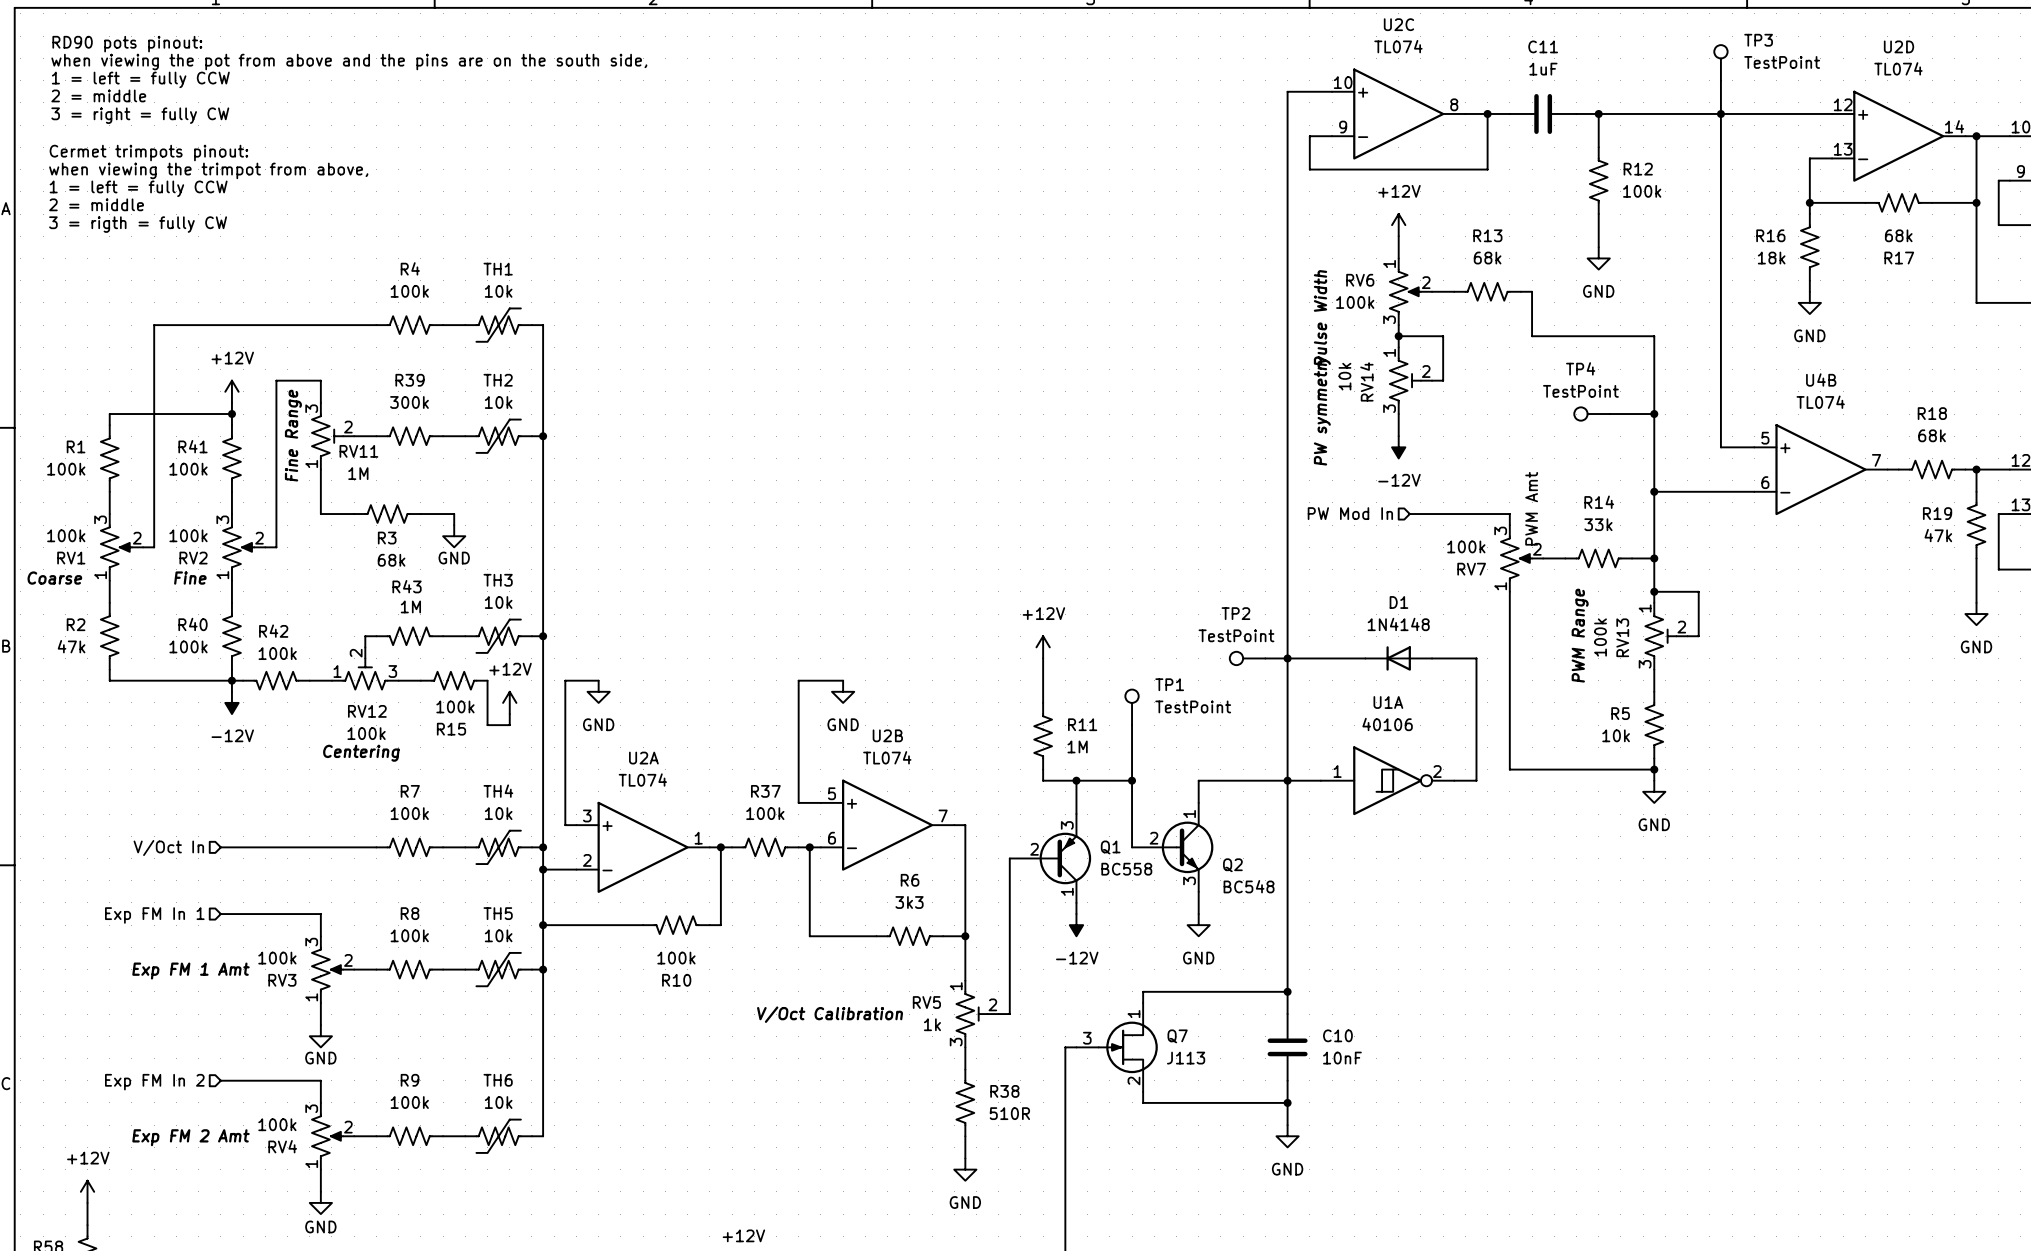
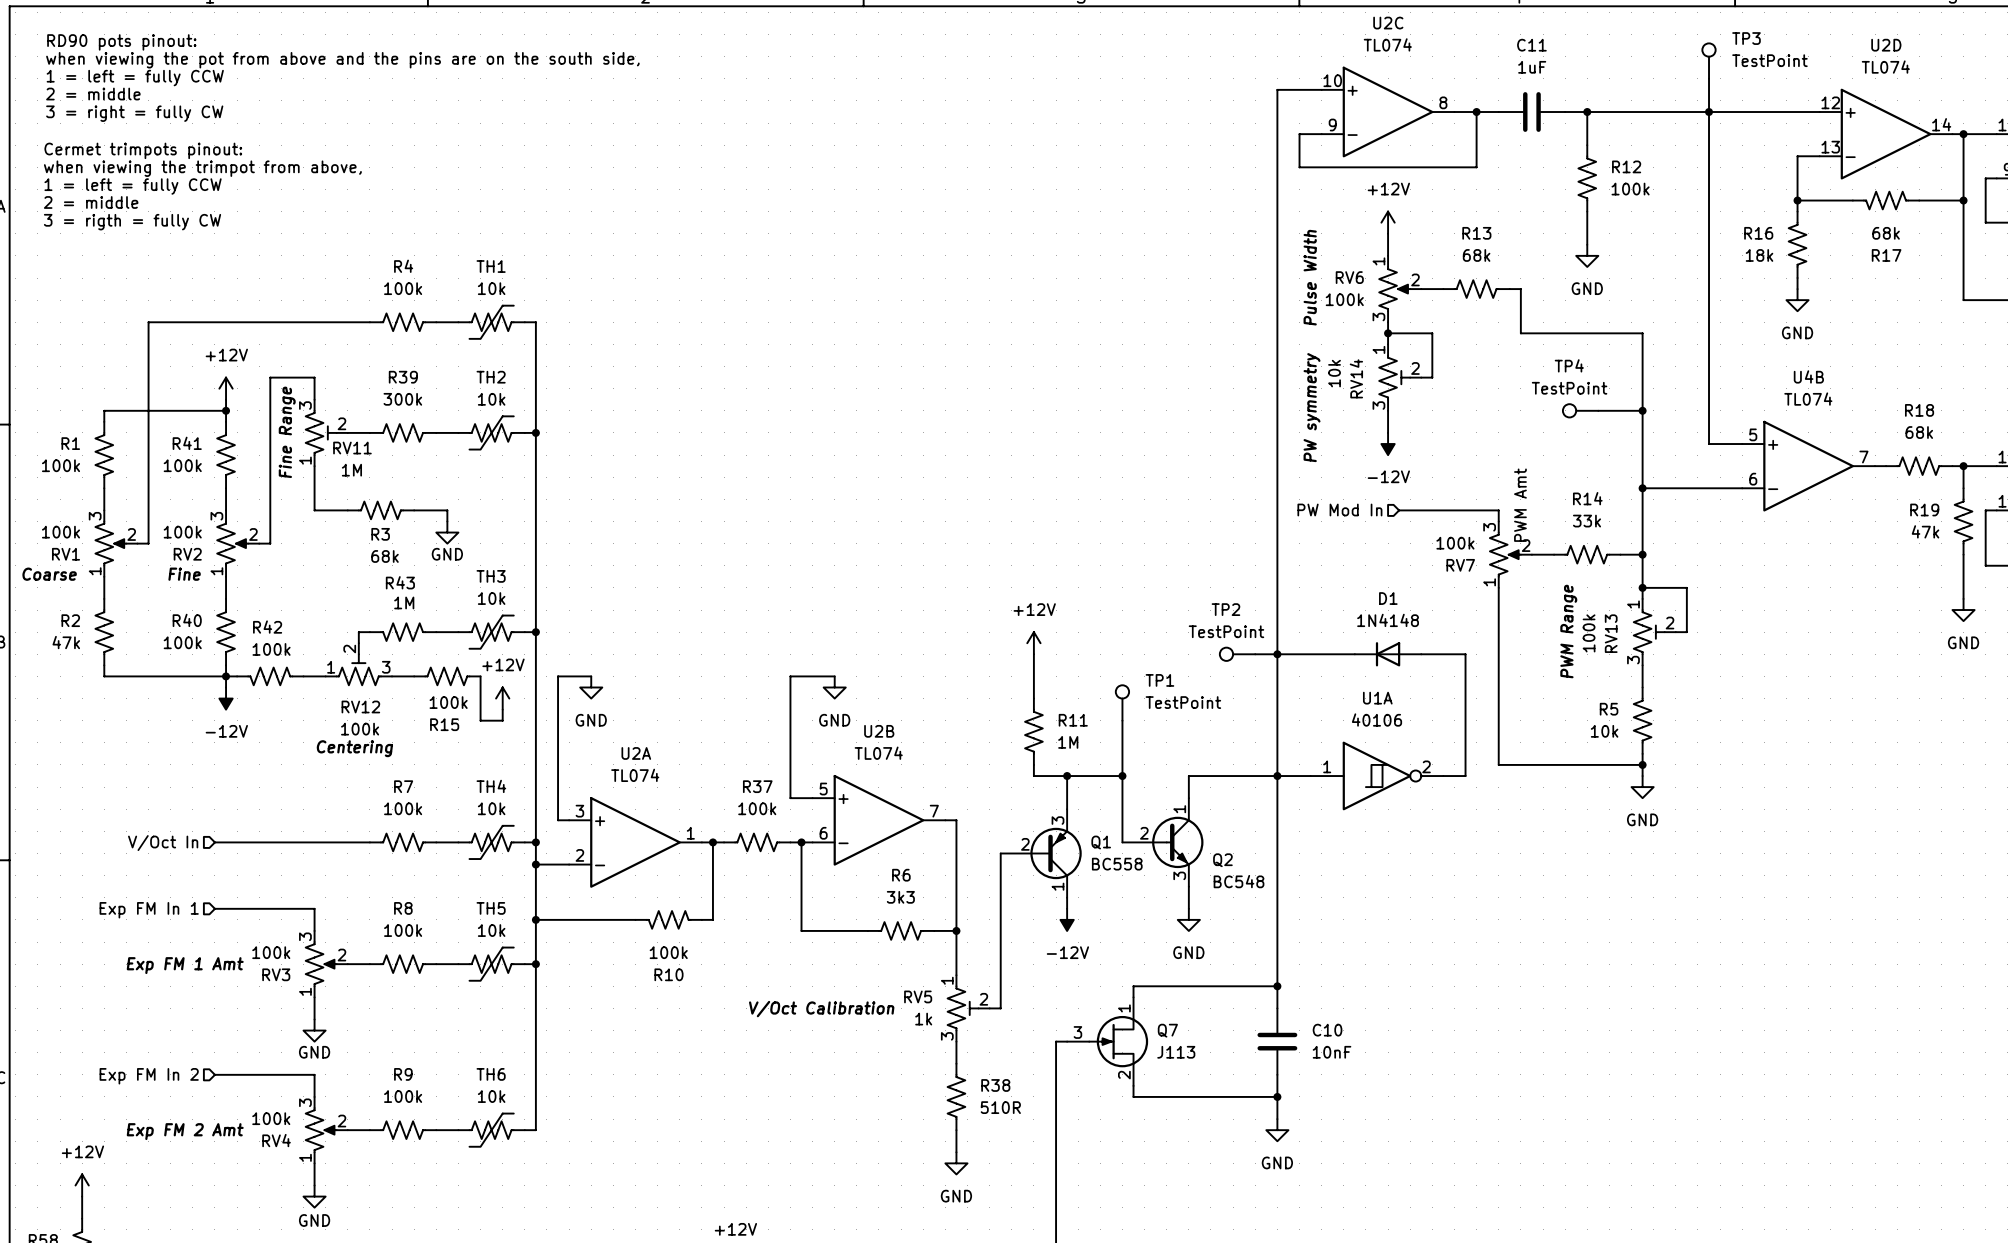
RV6 text position: Pulse Width (1320, 318) -> Pulse Width (1310, 277)

